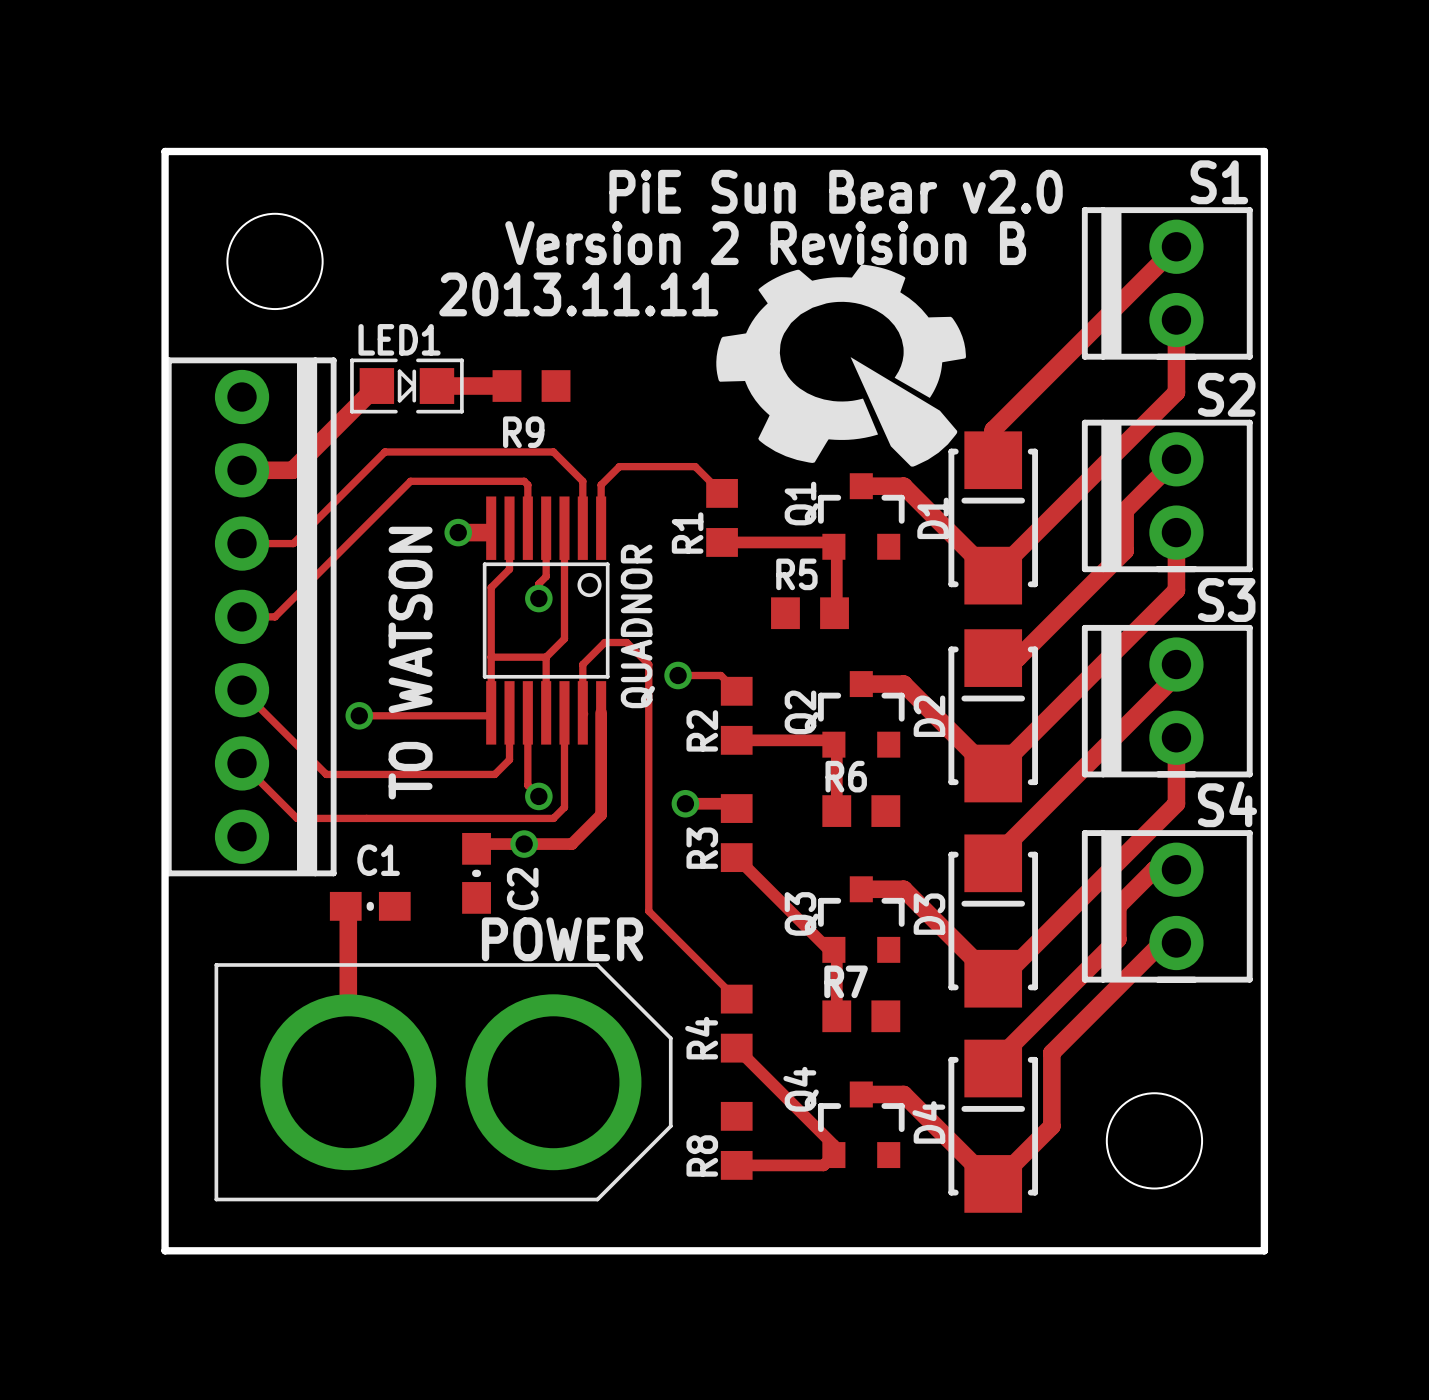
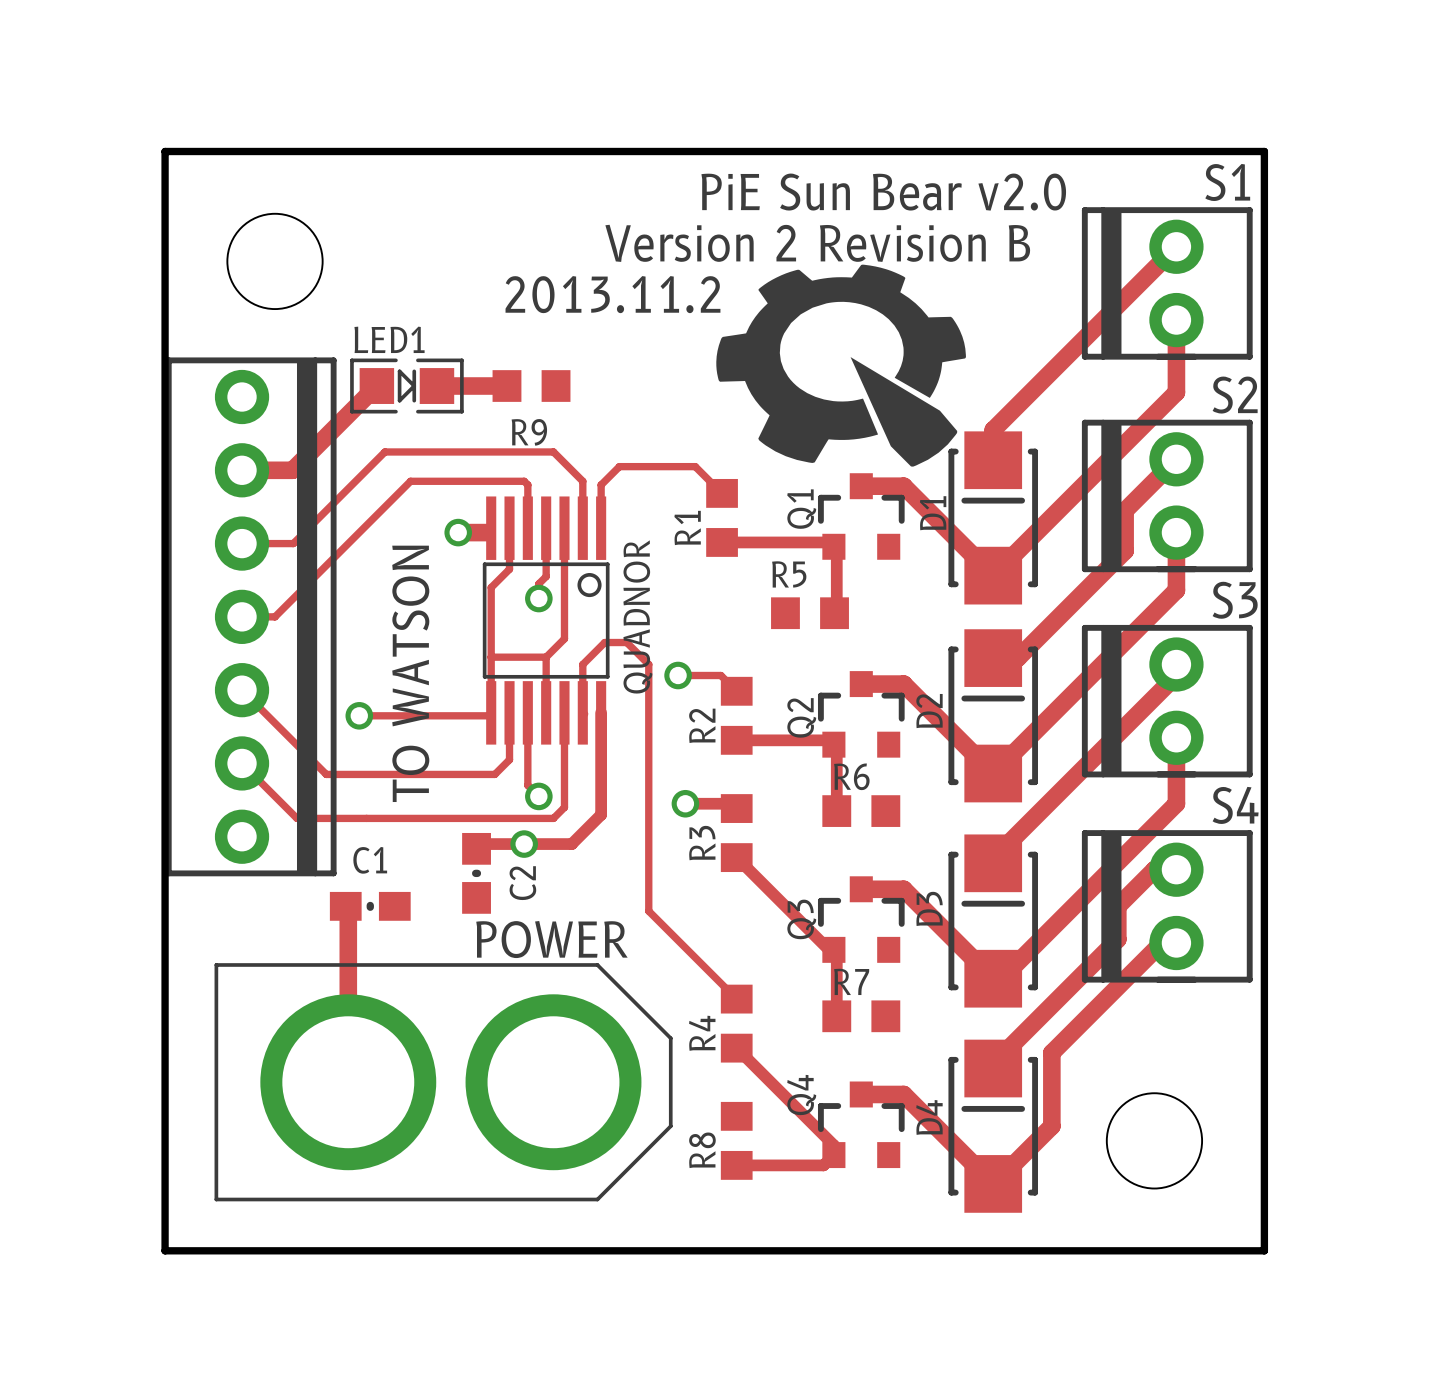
text: 2013.11.11 (578, 294) -> 2013.11.2 (612, 294)

